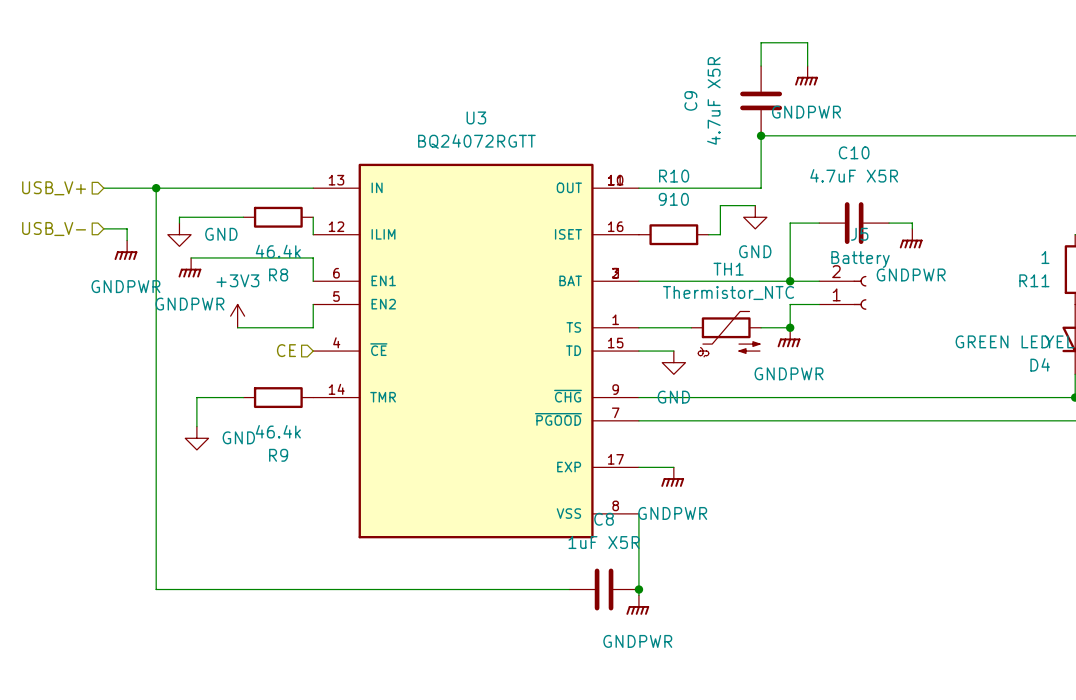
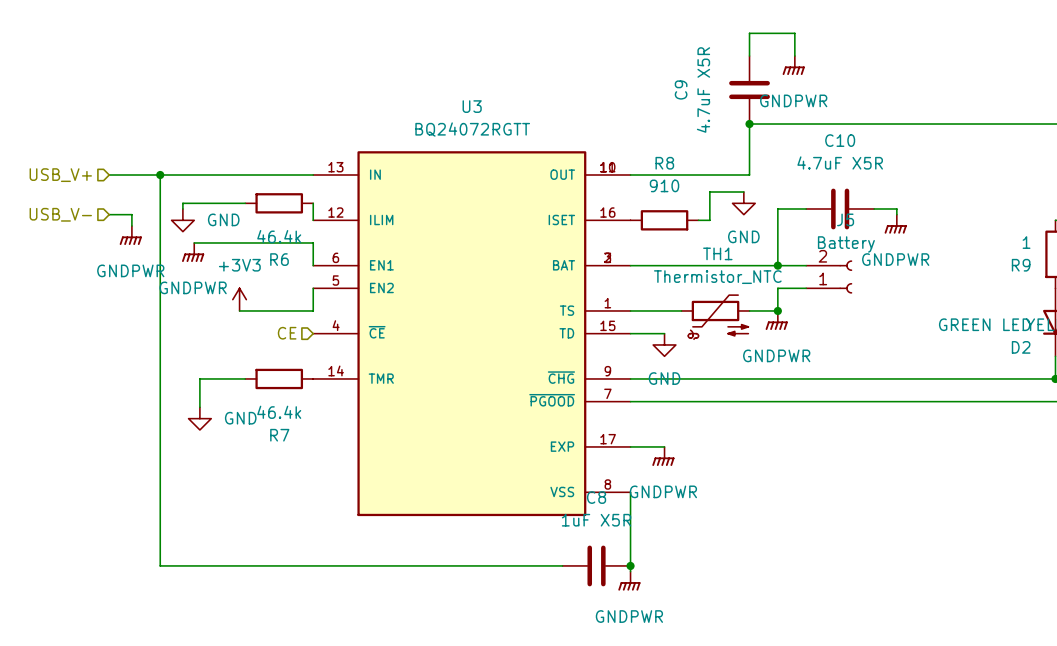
R10 name: R10 (674, 176) -> R8 (664, 163)
R8 name: R8 (278, 274) -> R6 (279, 259)
R11 name: R11 (1034, 280) -> R9 (1021, 265)
D4 name: D4 (1040, 364) -> D2 (1021, 347)
R9 name: R9 (278, 455) -> R7 (279, 435)

